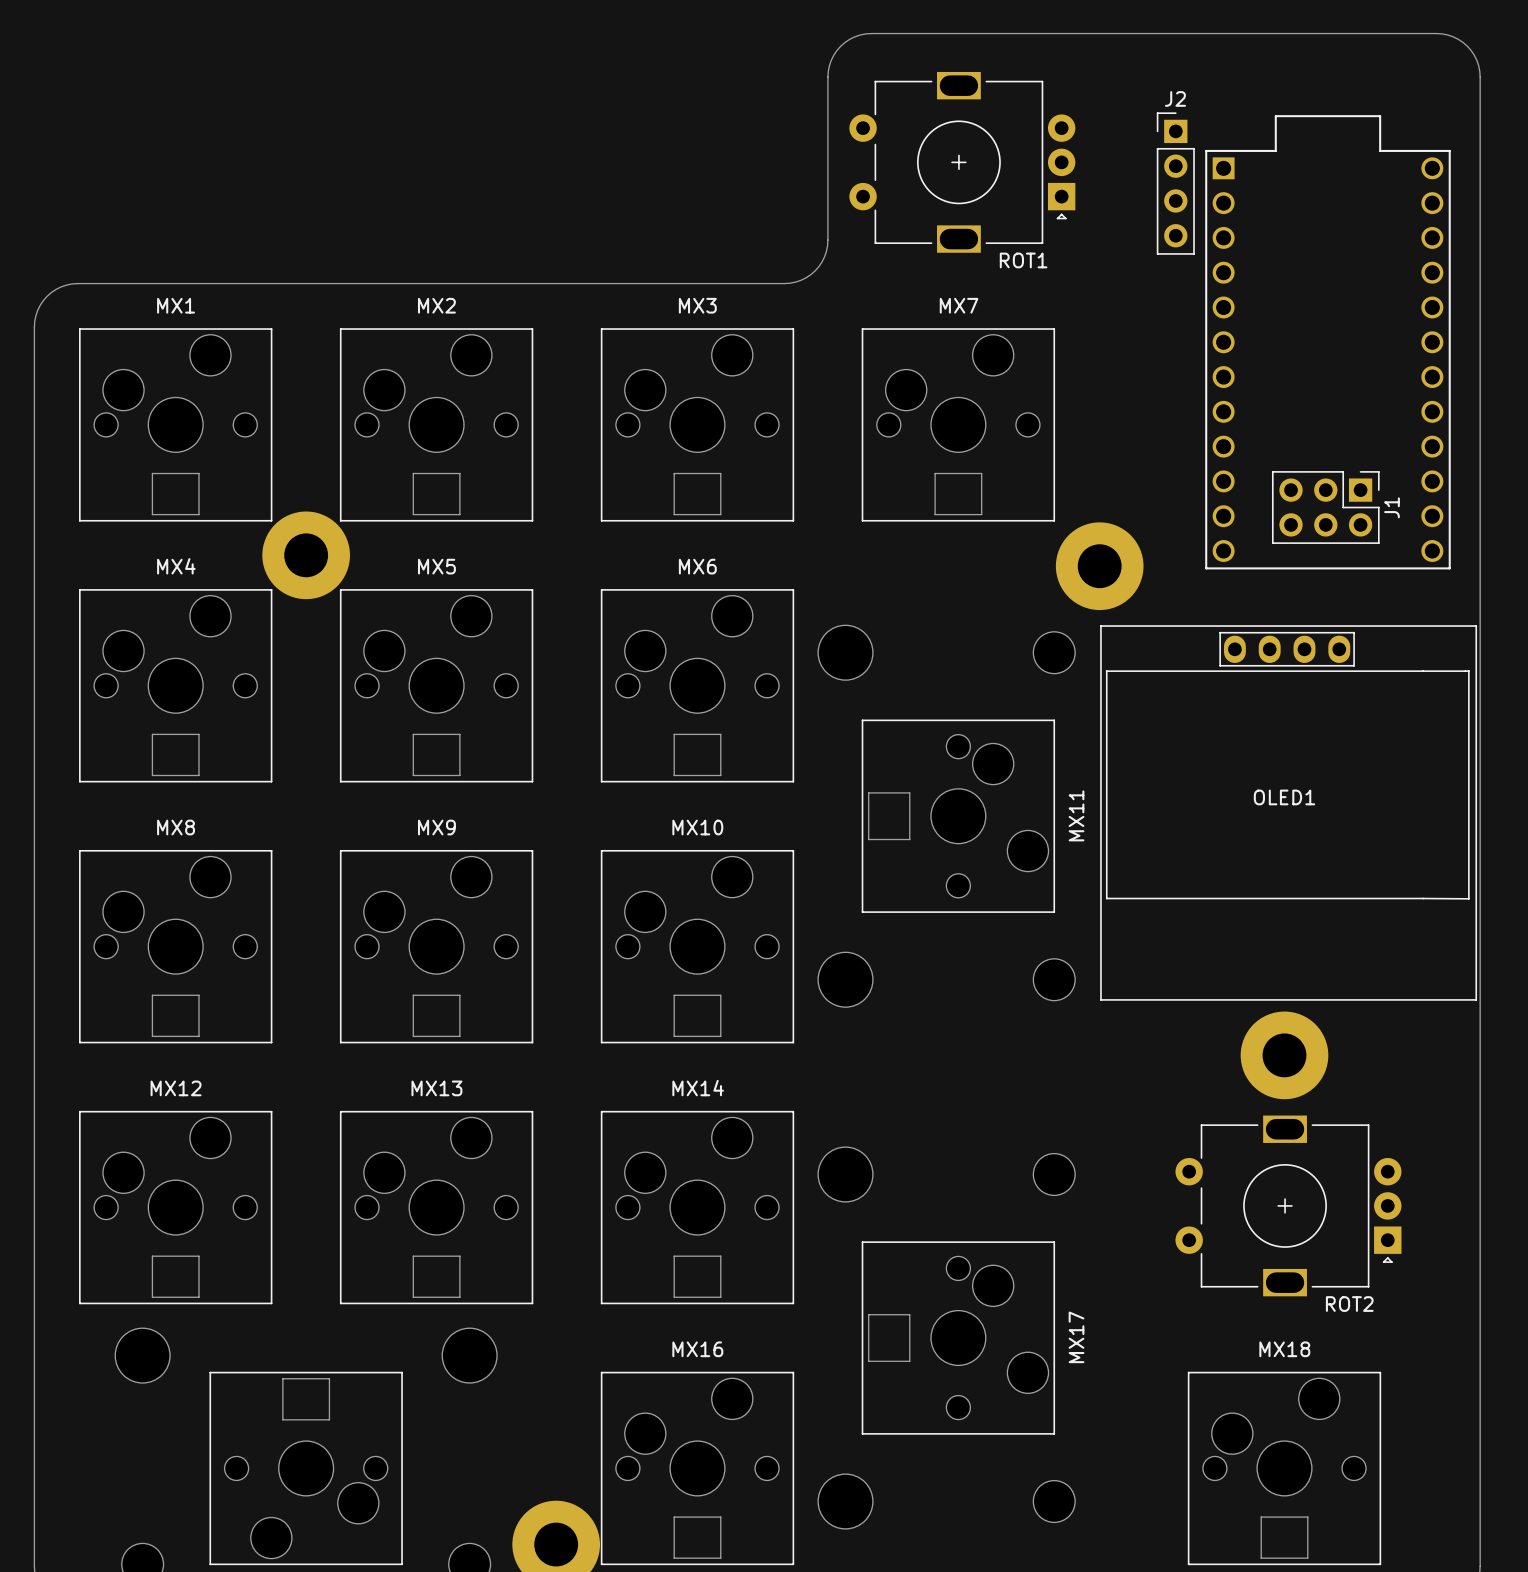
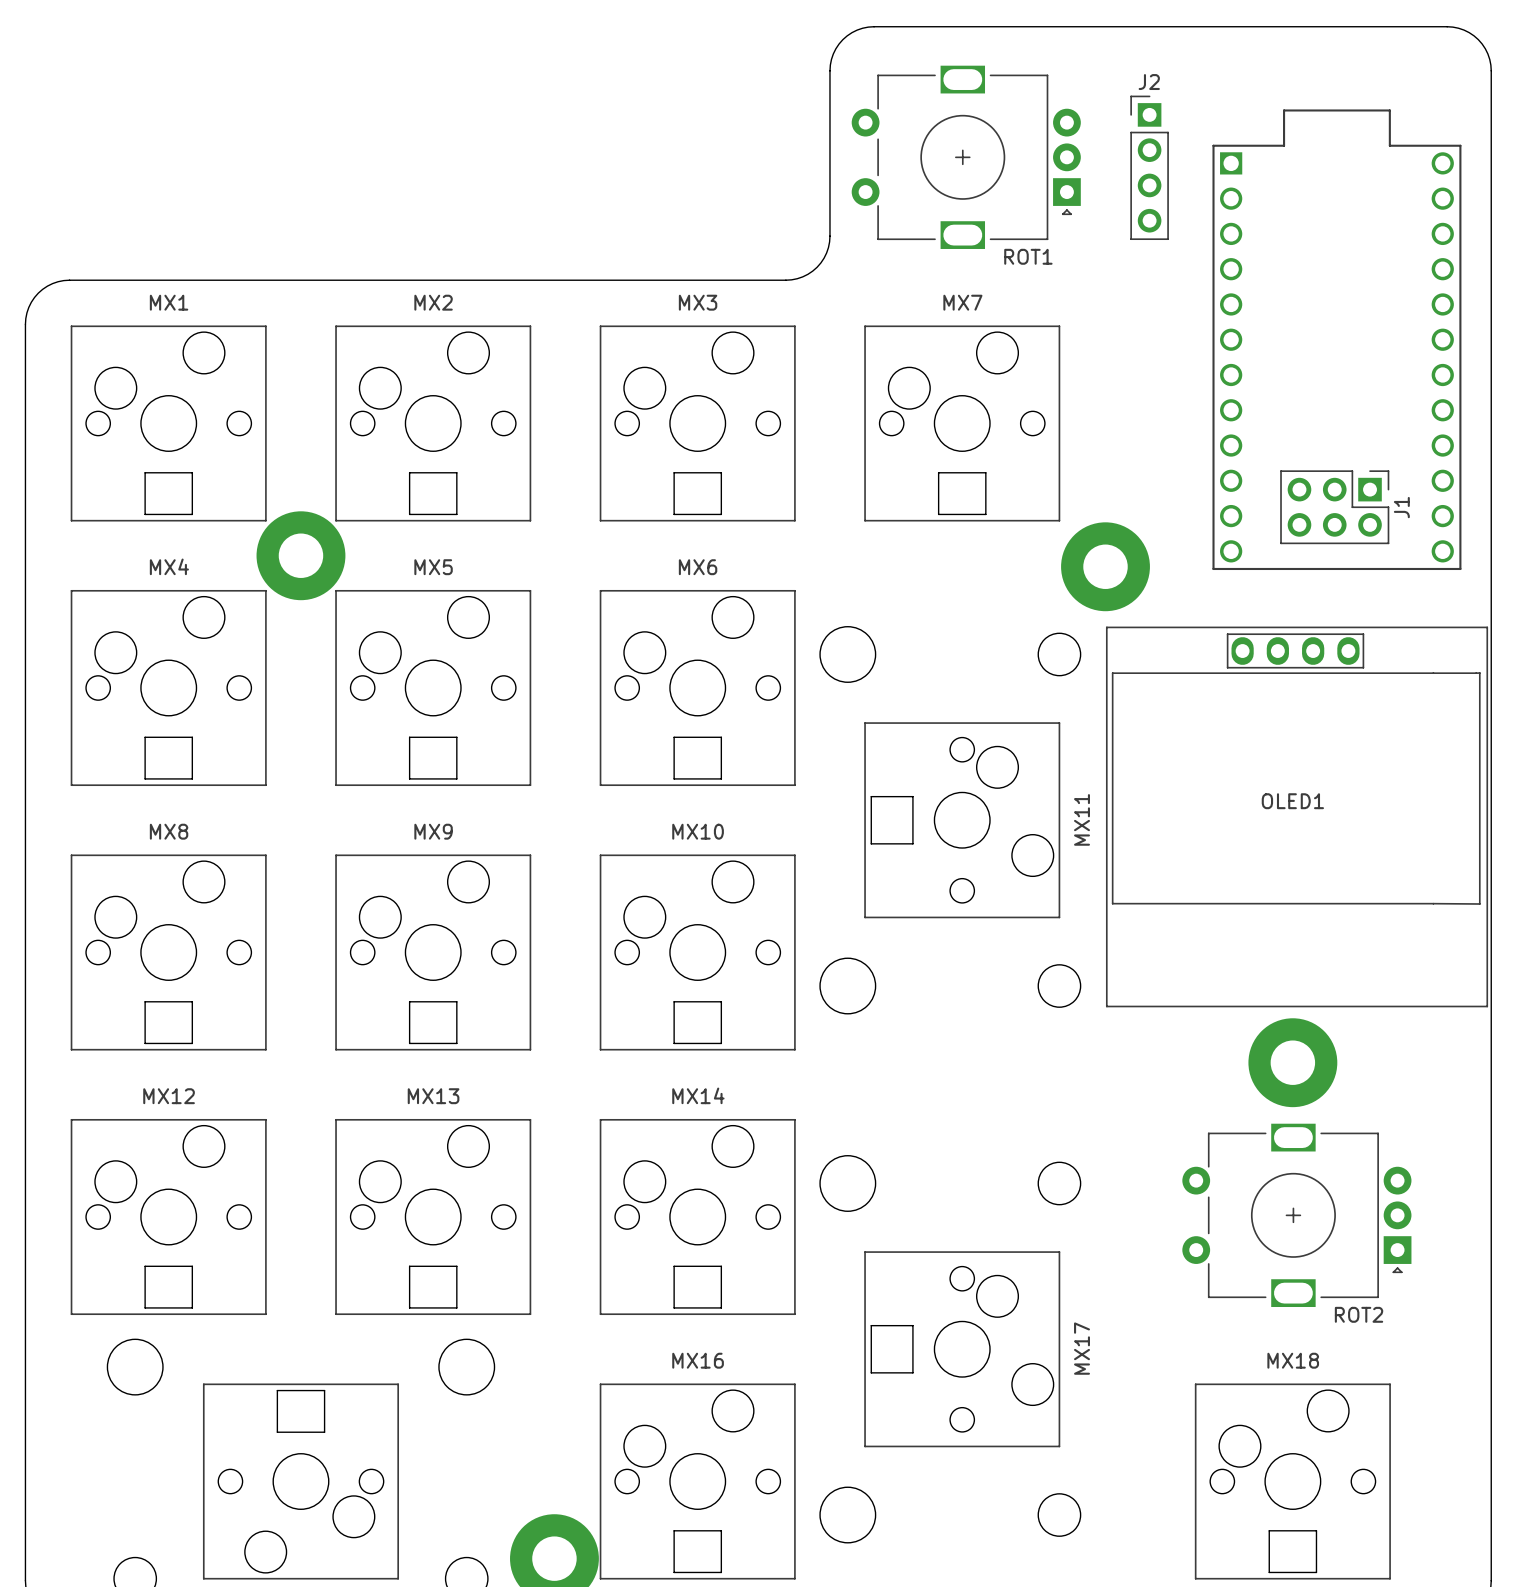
J2 position: (1175, 183) -> (1149, 167)

